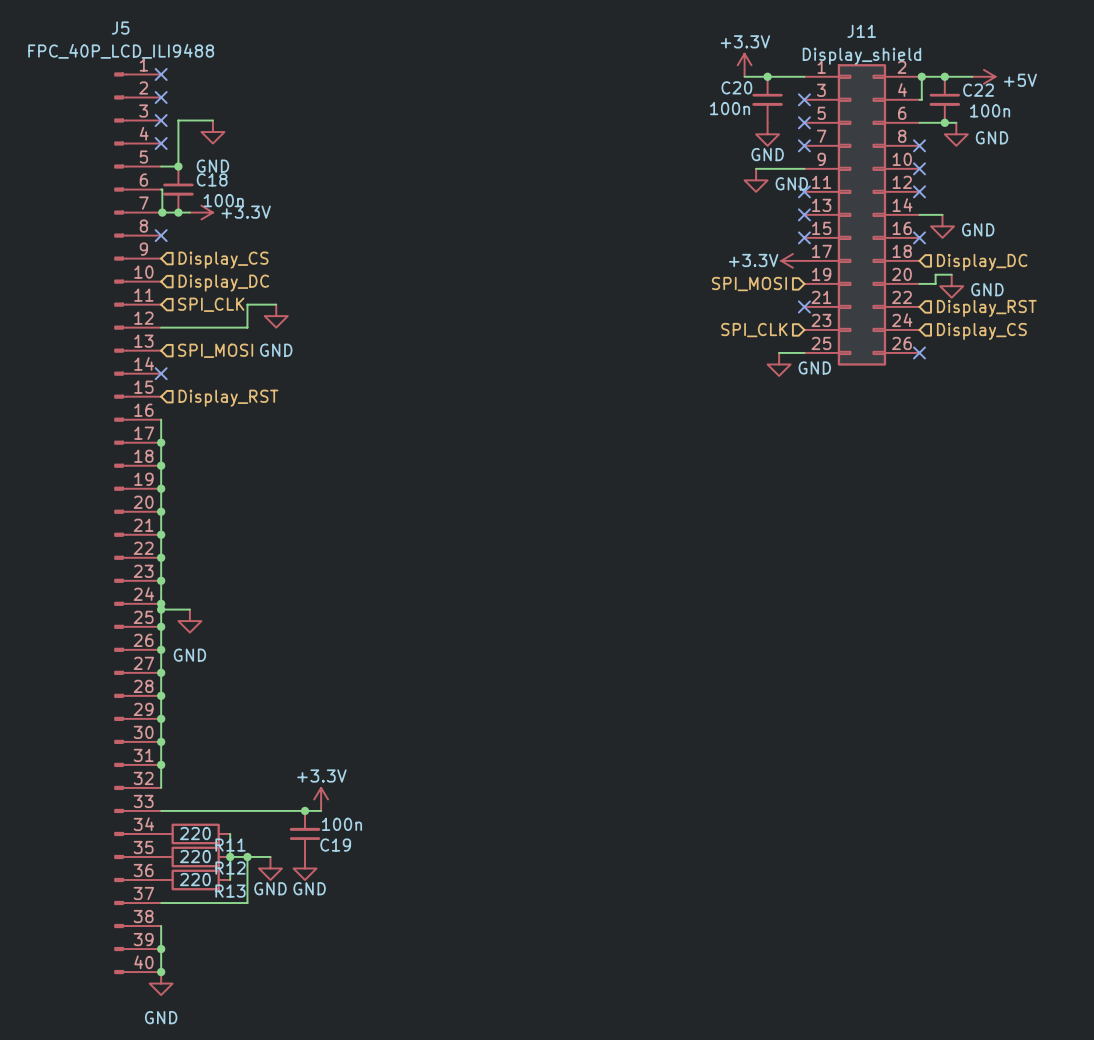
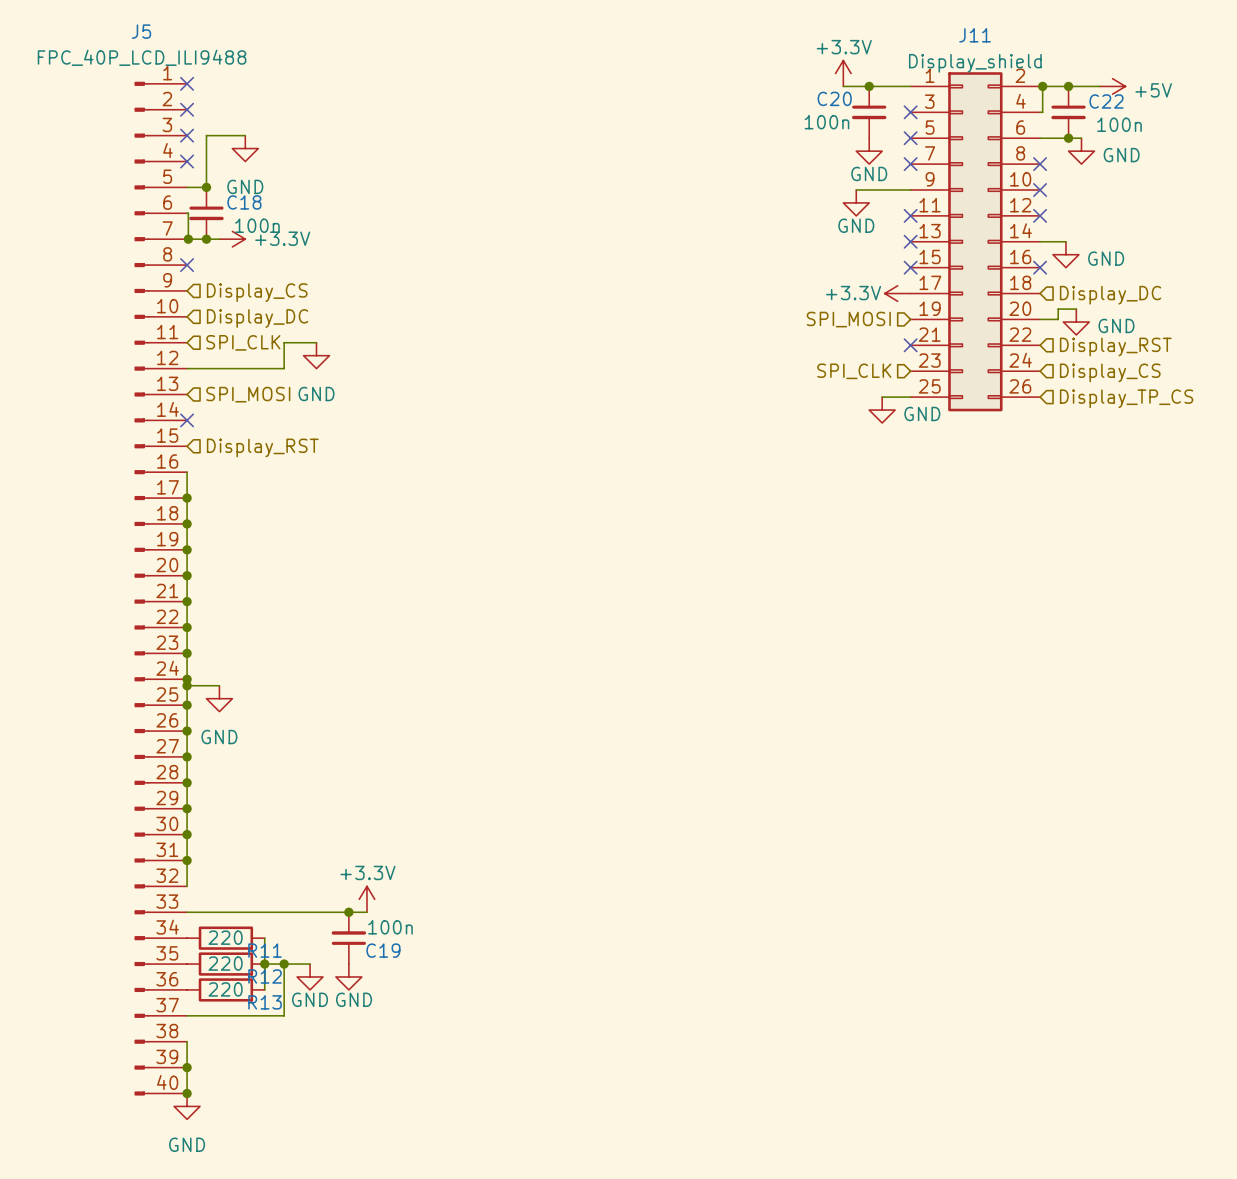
power symbol text position: GND (791, 183) -> GND (856, 225)
no-connect mark: (919, 352) -> none
hierarchical label: none -> Display_TP_CS (1126, 398)

